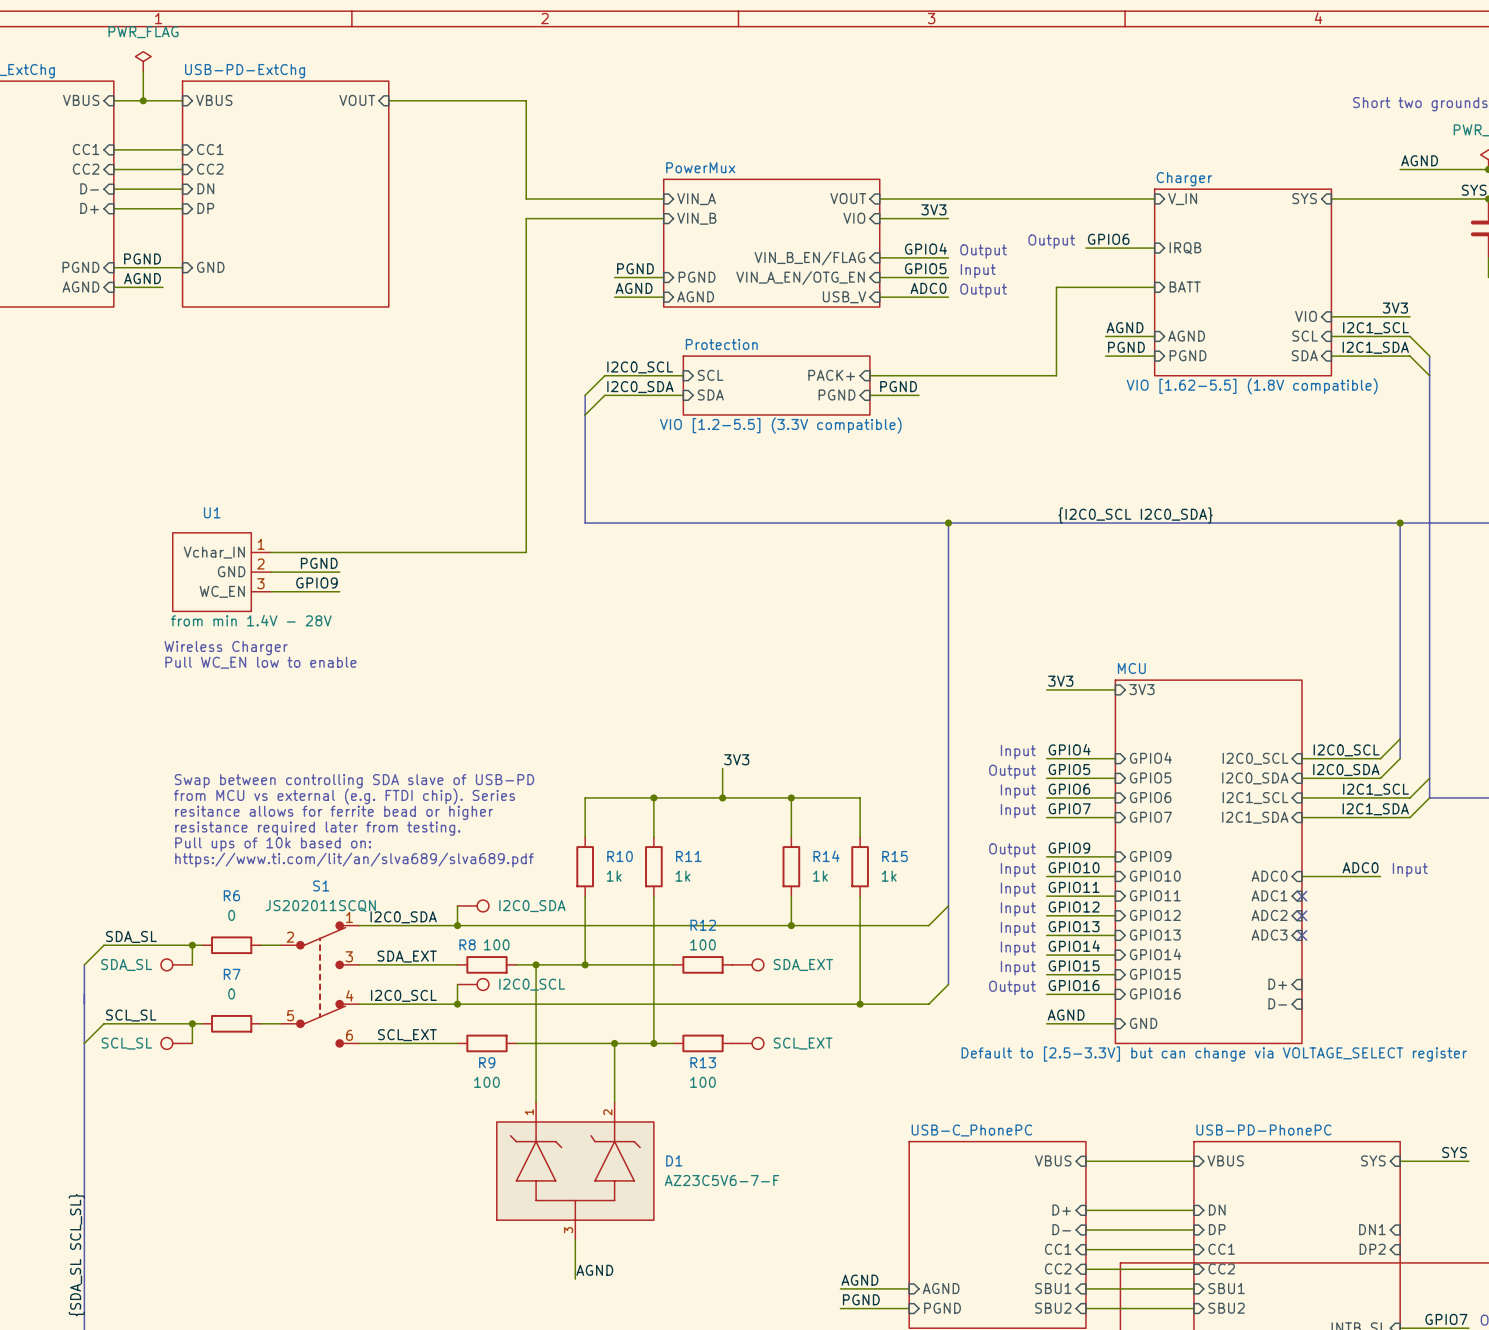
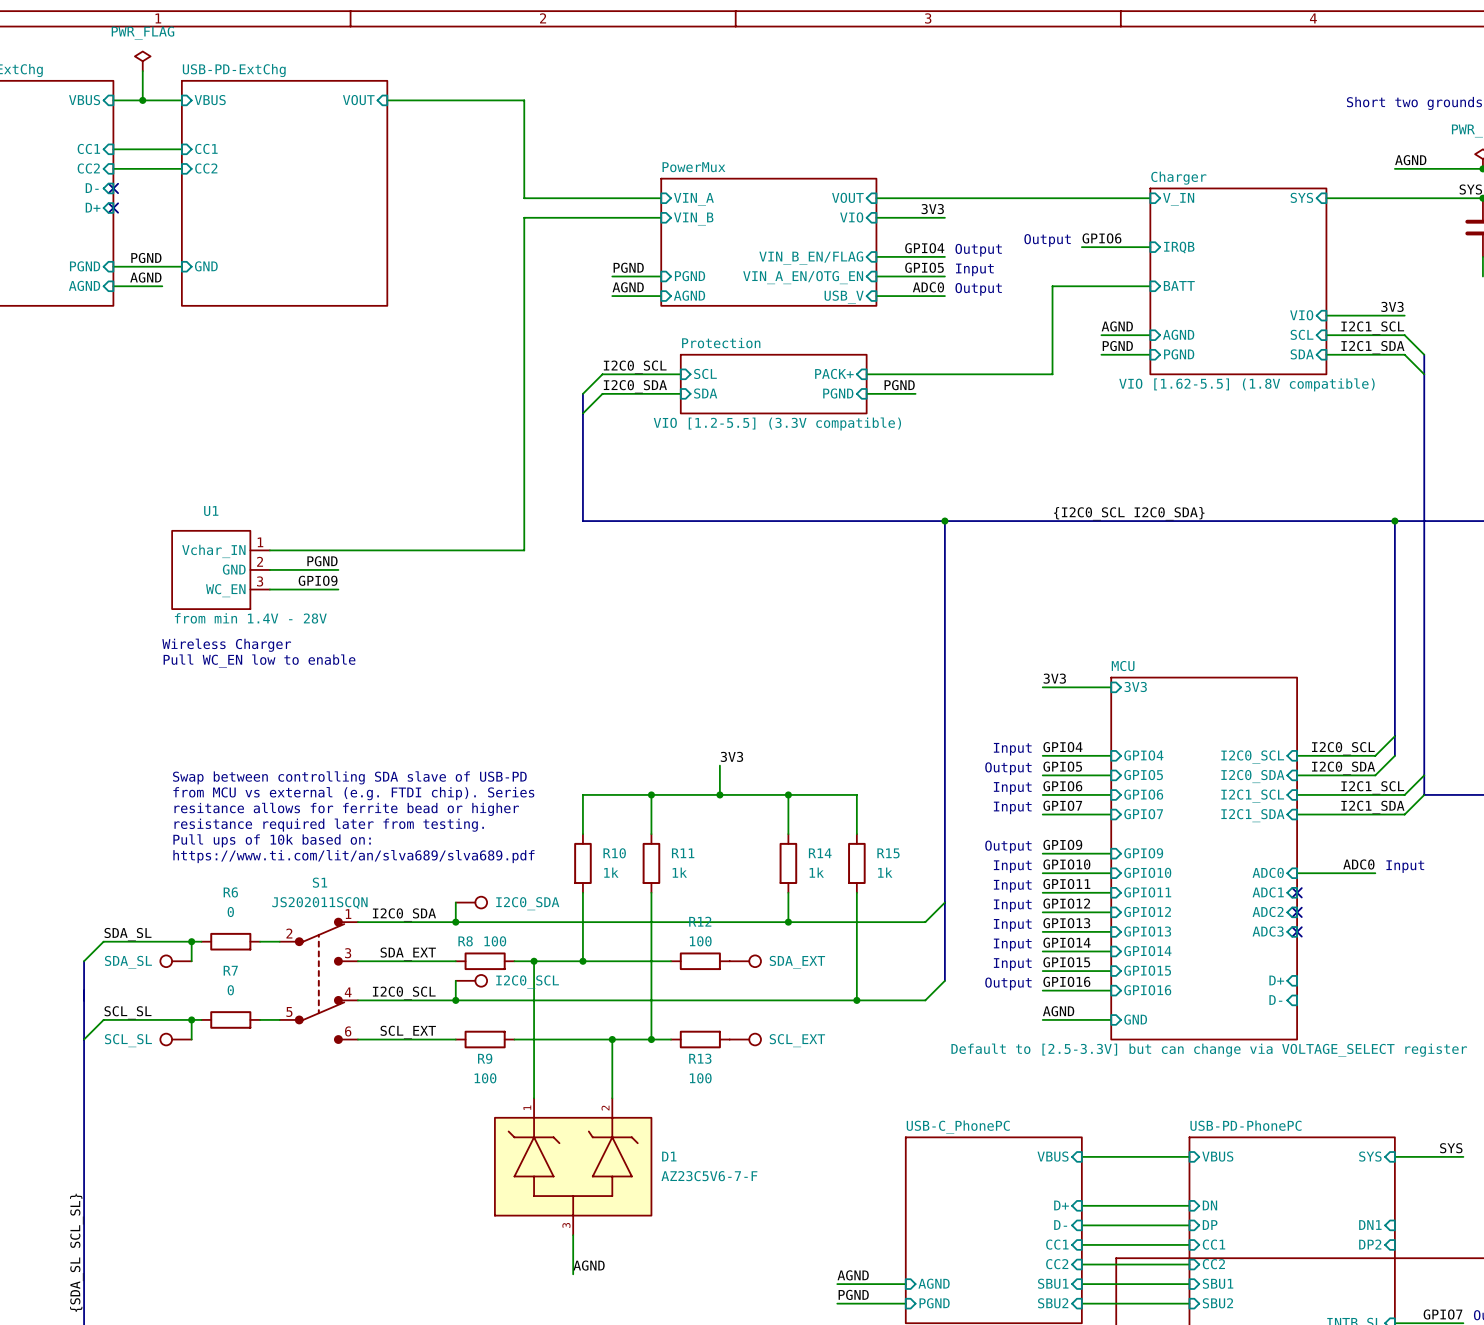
sheet pin: DN (205, 188) -> none
wire: (113, 189) (182, 189) -> none
no-connect mark: none -> (113, 188)
wire: (113, 208) (182, 208) -> none
no-connect mark: none -> (113, 208)
sheet pin: DP (205, 208) -> none

